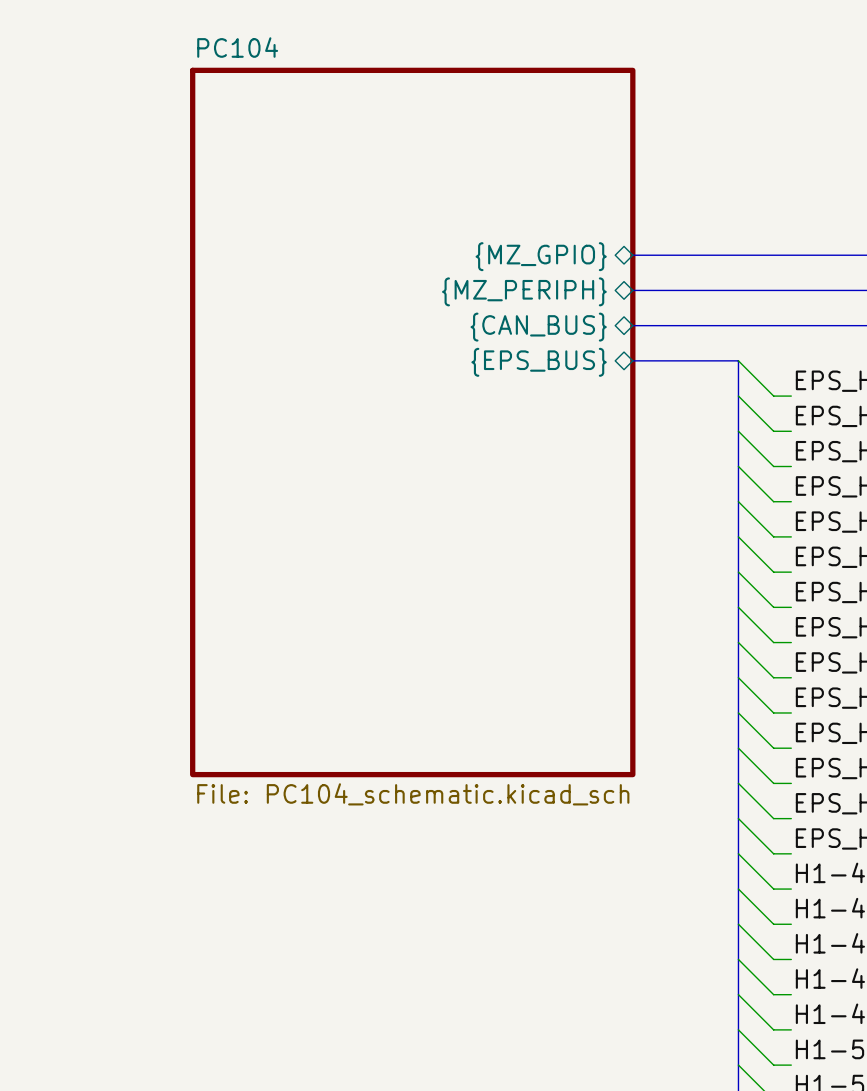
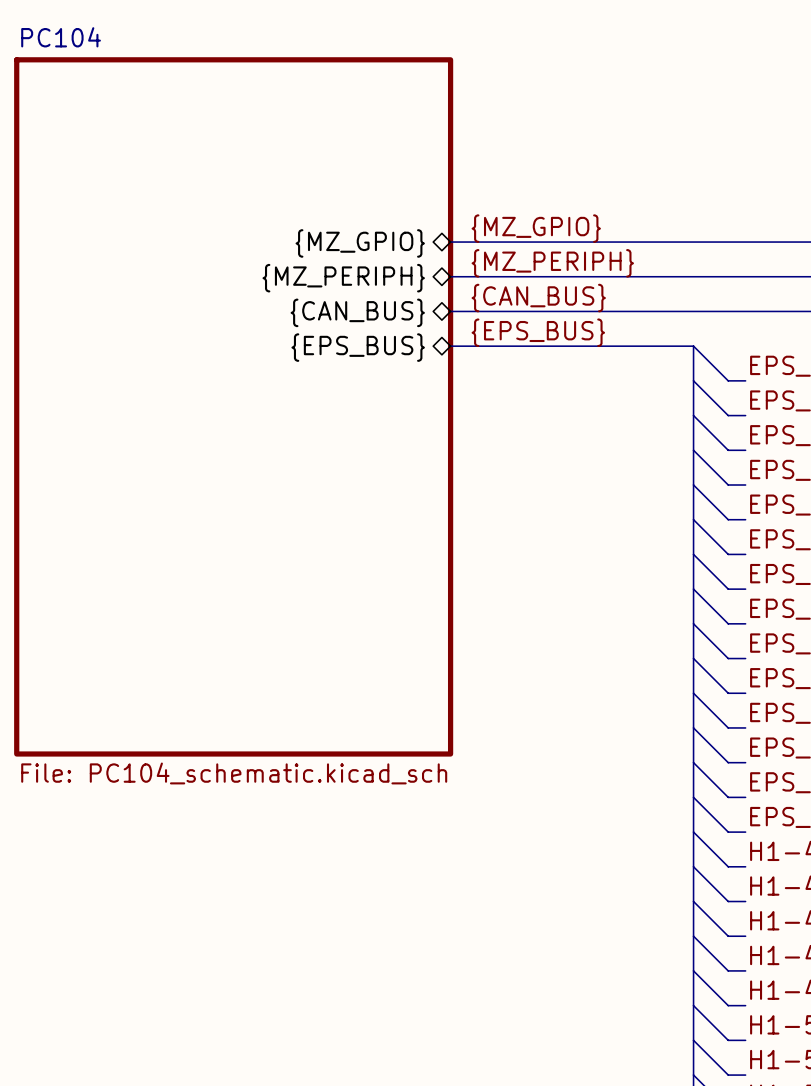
label: none -> {MZ_GPIO} (536, 228)
bus: none -> (450, 242) (589, 242)
sheet pin position: {MZ_GPIO} (541, 256) -> {MZ_GPIO} (360, 243)
label: none -> {MZ_PERIPH} (552, 263)
bus: none -> (450, 276) (589, 276)
sheet pin position: {MZ_PERIPH} (524, 291) -> {MZ_PERIPH} (343, 278)
label: none -> {CAN_BUS} (538, 298)
bus: none -> (450, 311) (589, 311)
sheet pin position: {CAN_BUS} (538, 327) -> {CAN_BUS} (357, 312)
label: none -> {EPS_BUS} (538, 332)
bus: none -> (450, 346) (589, 346)
sheet pin position: {EPS_BUS} (539, 362) -> {EPS_BUS} (358, 347)
sheet PC104 position: (412, 422) -> (233, 406)

